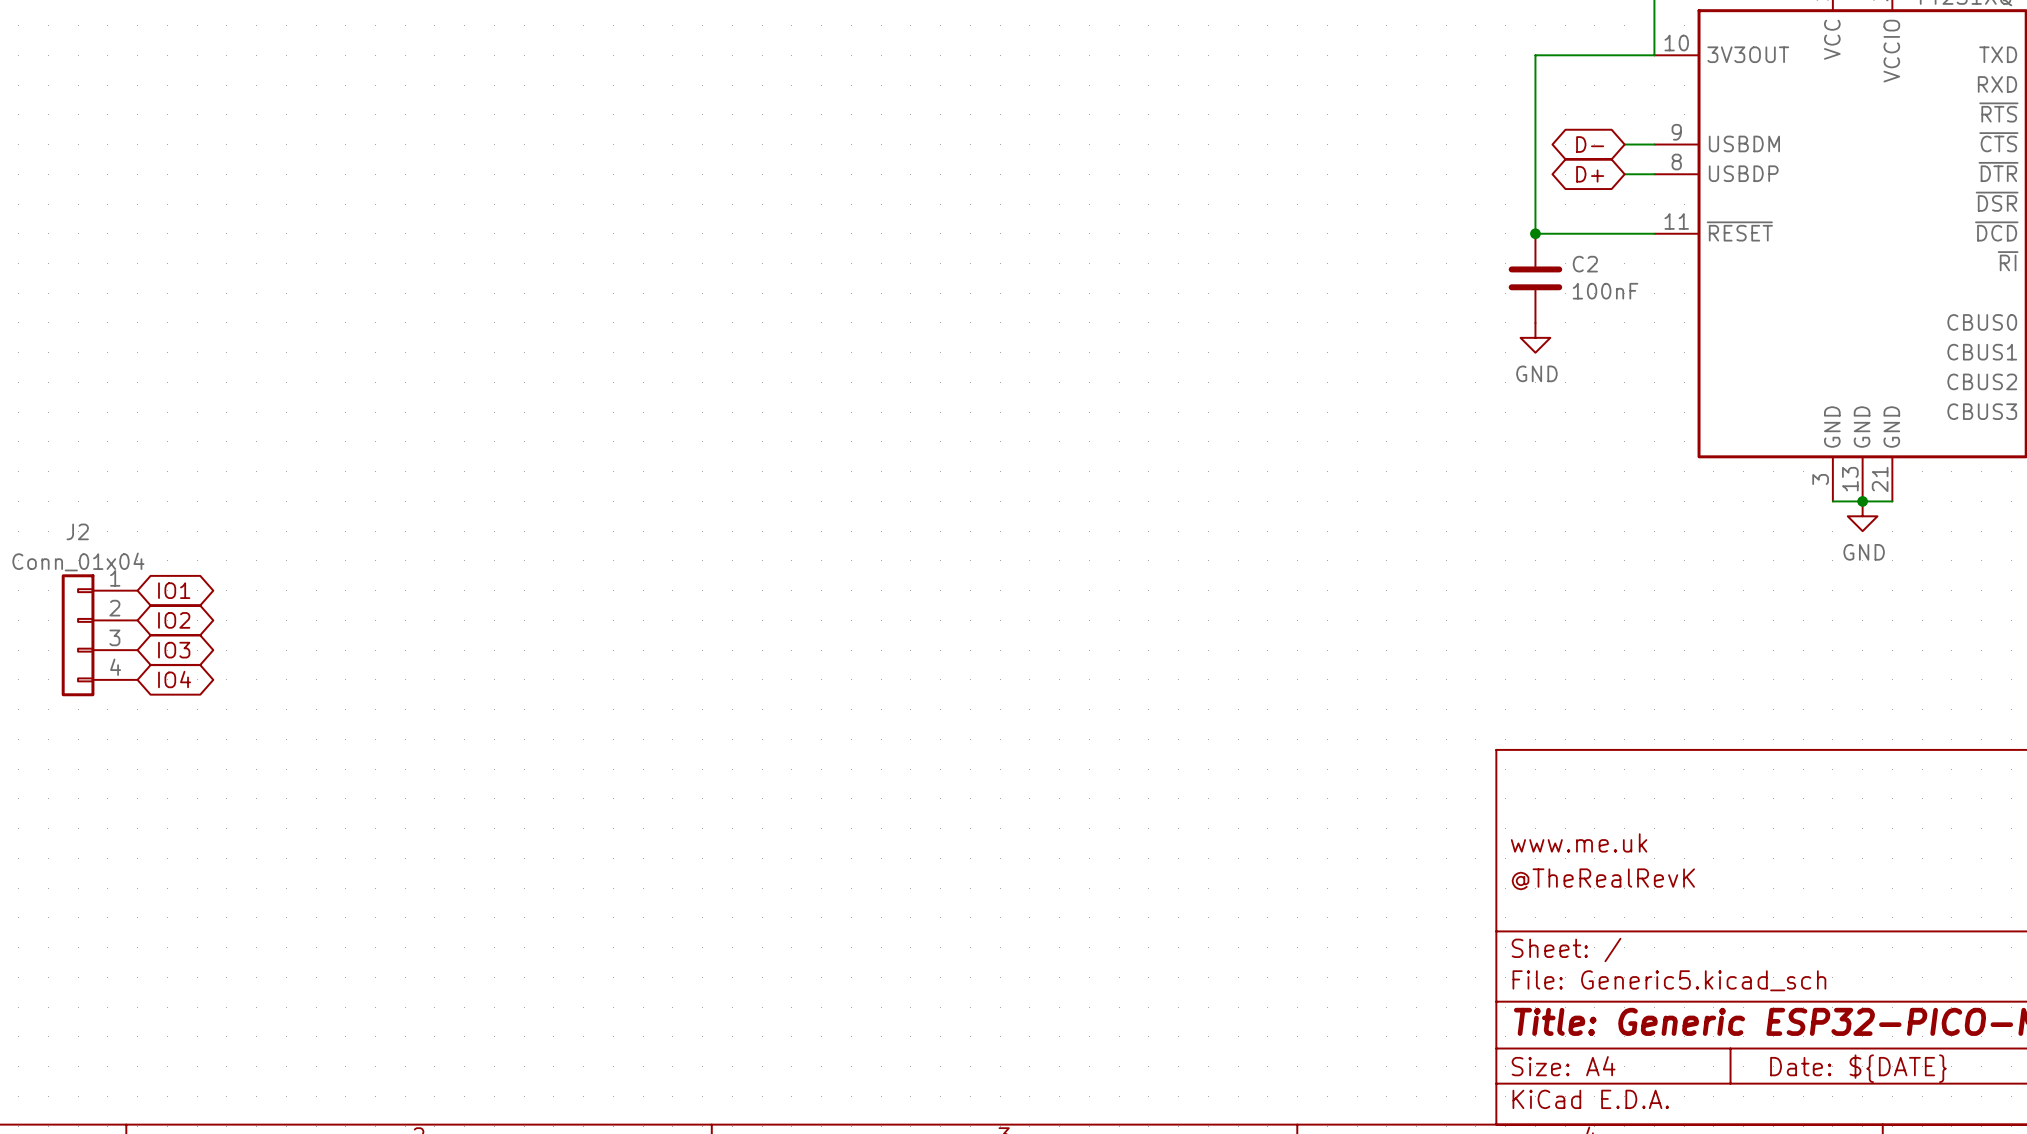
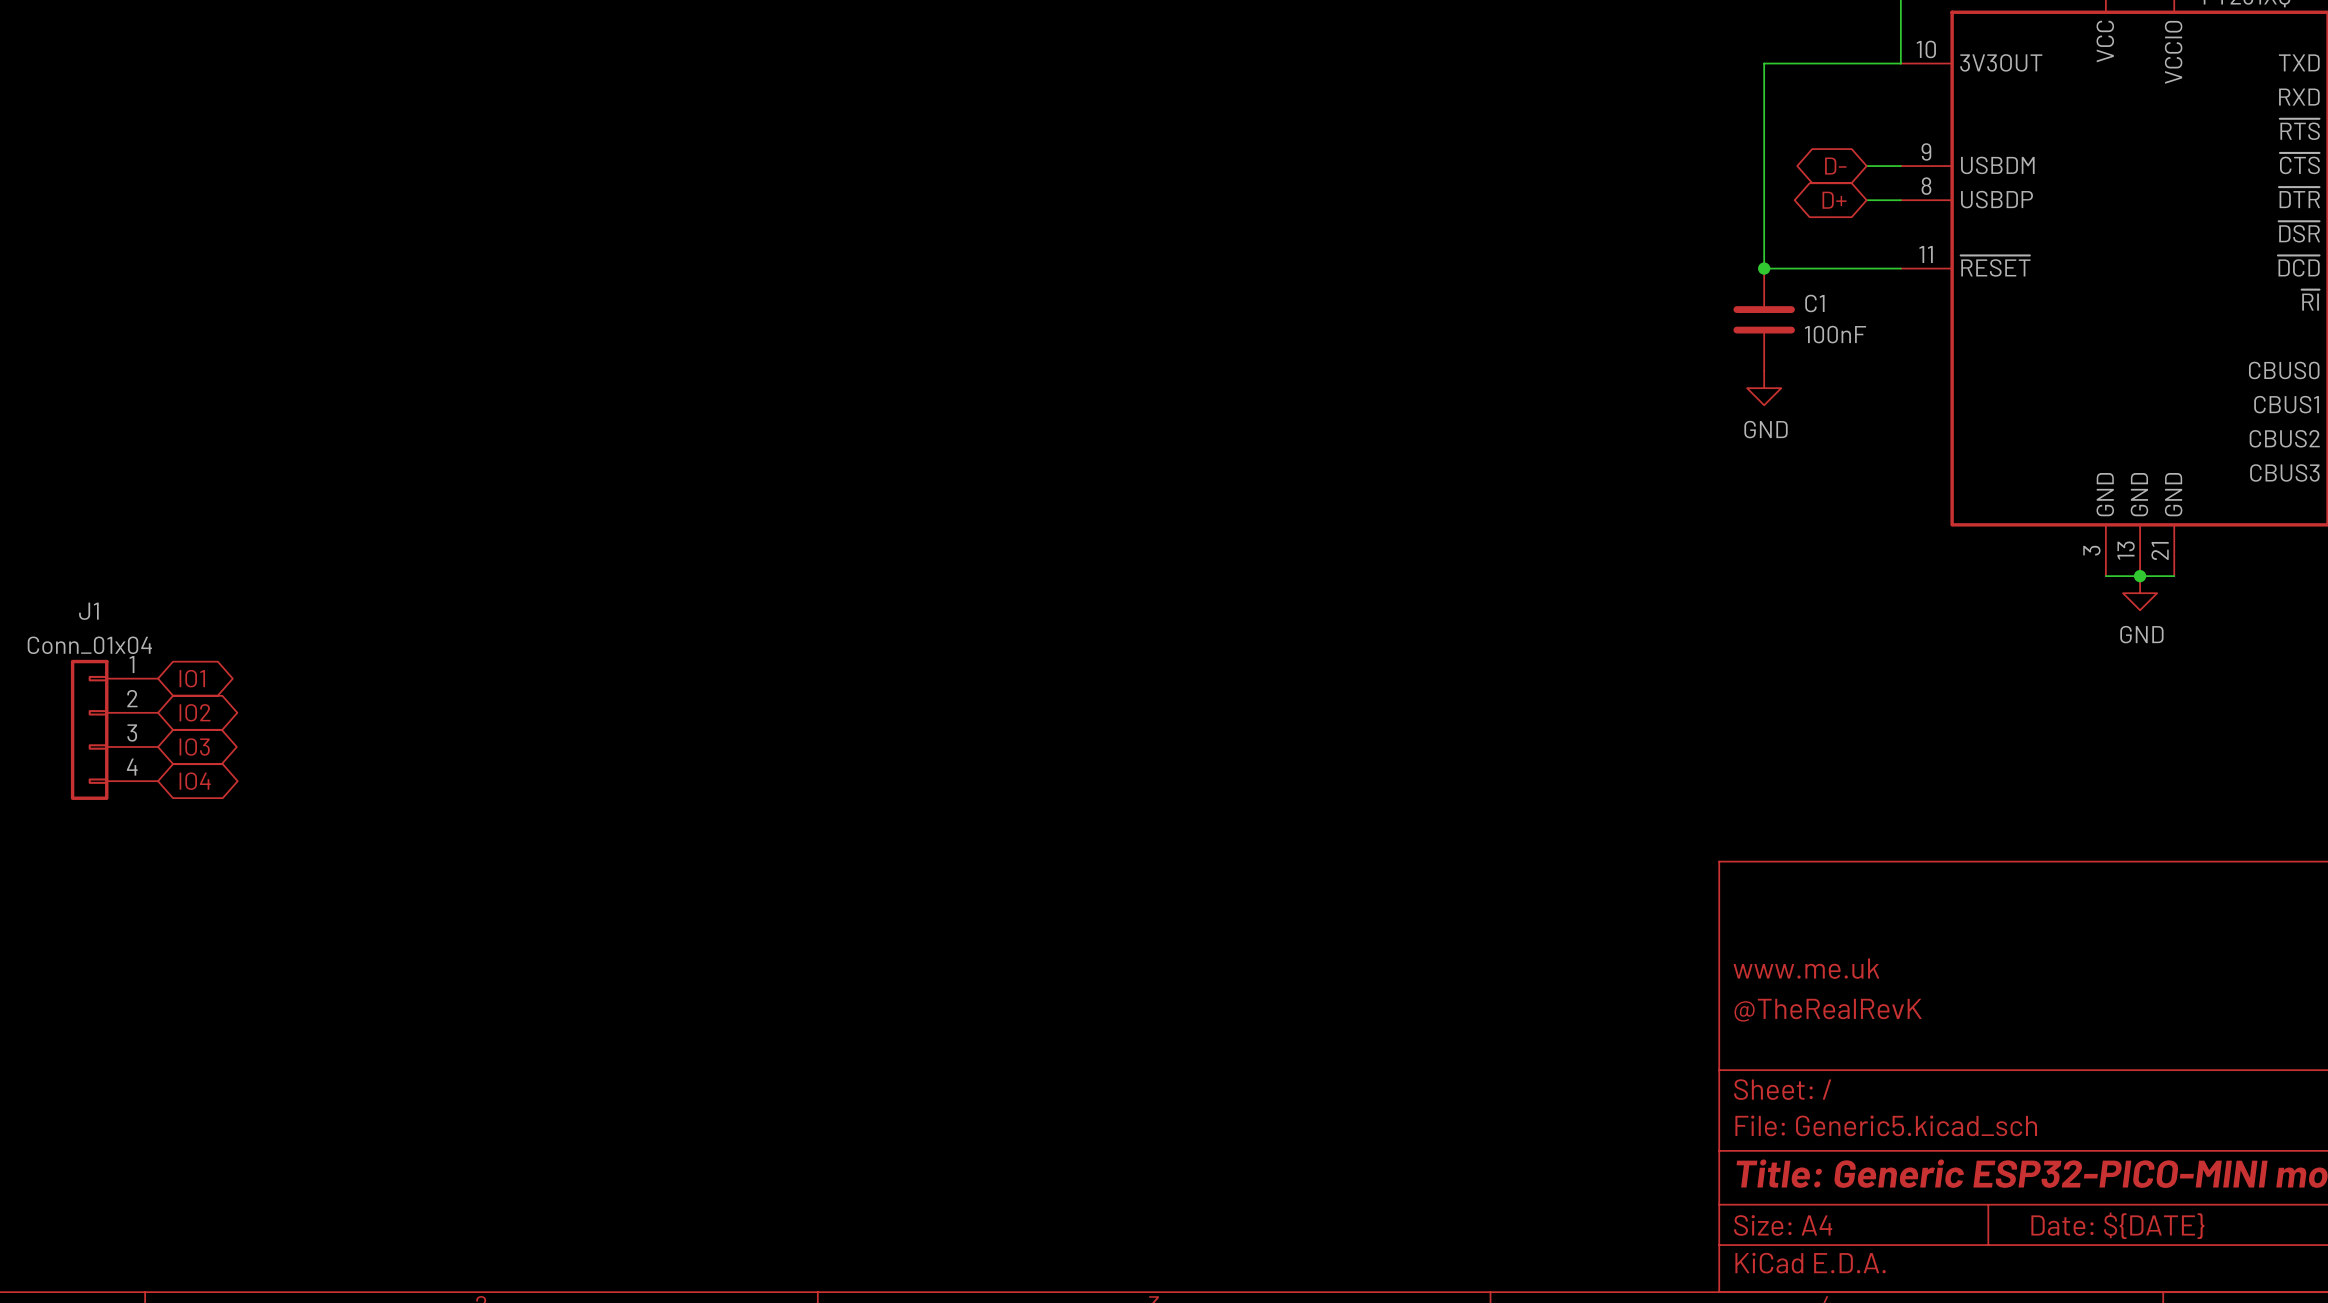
C2 name: C2 (1585, 264) -> C1 (1814, 303)
J2 name: J2 (77, 531) -> J1 (88, 611)

